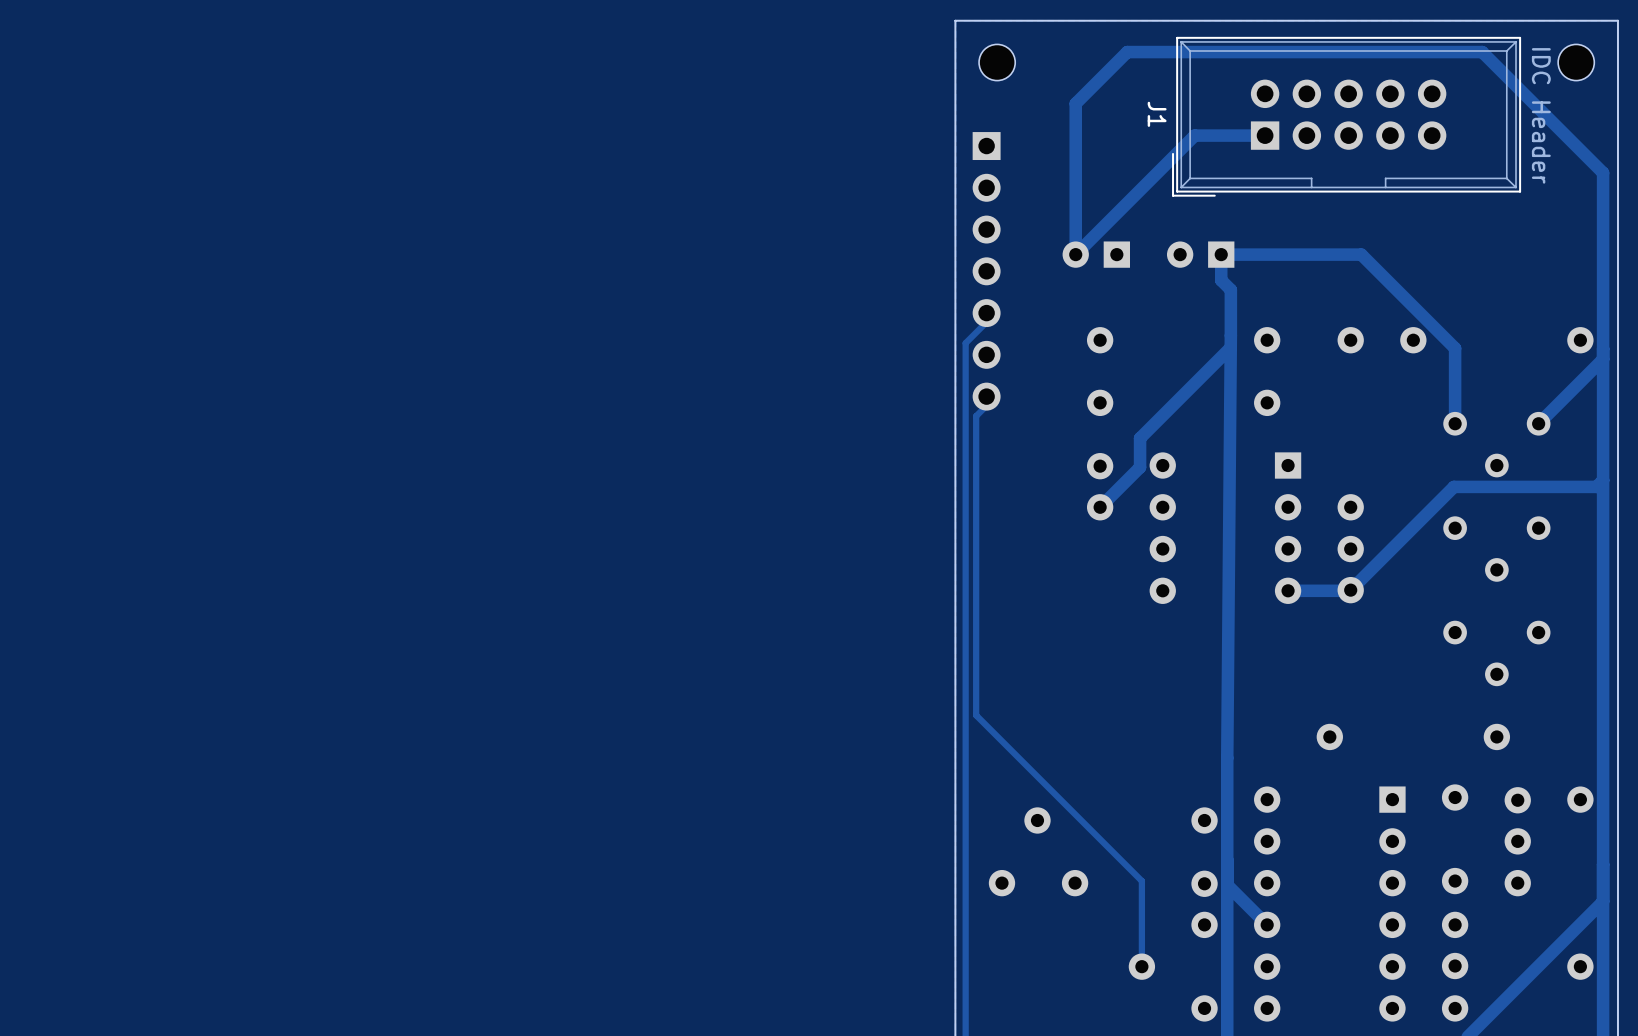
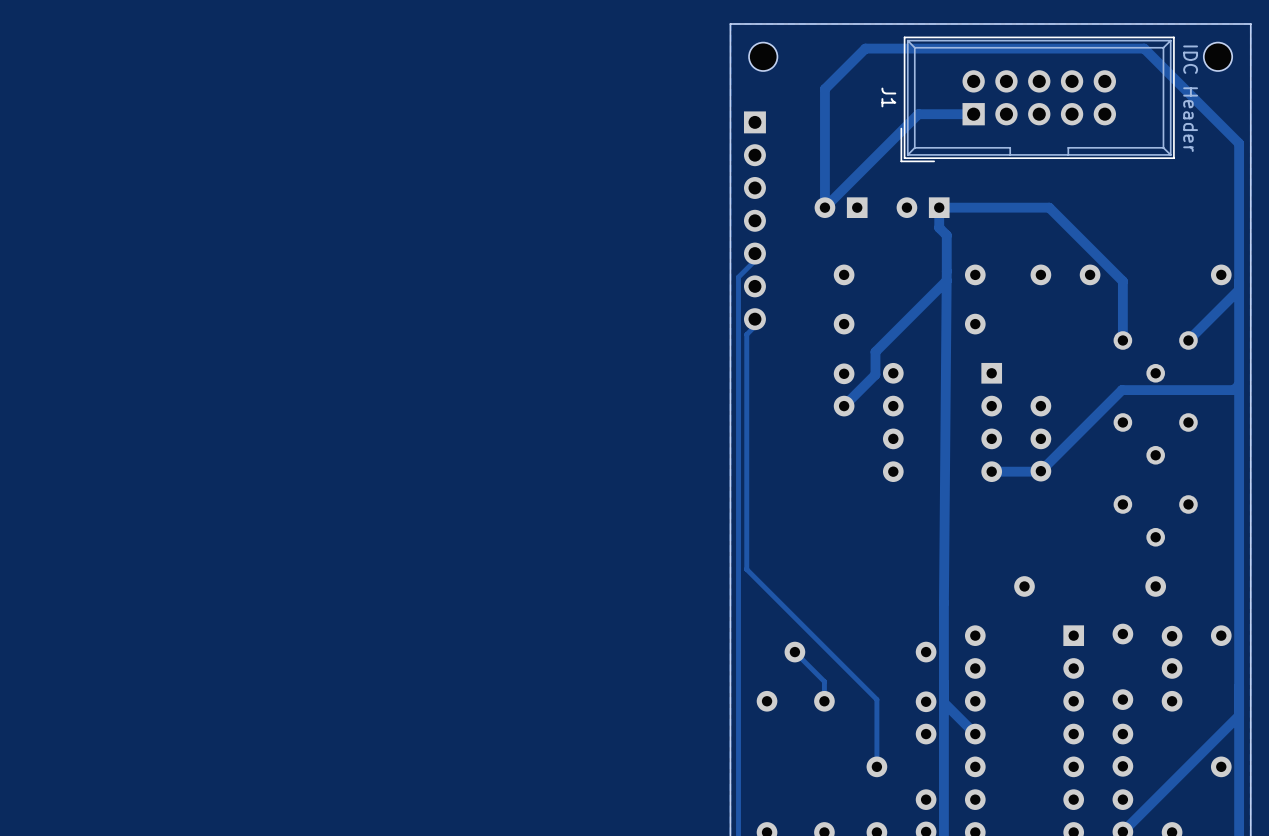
track: none -> (794, 652) (824, 681) (824, 701)

